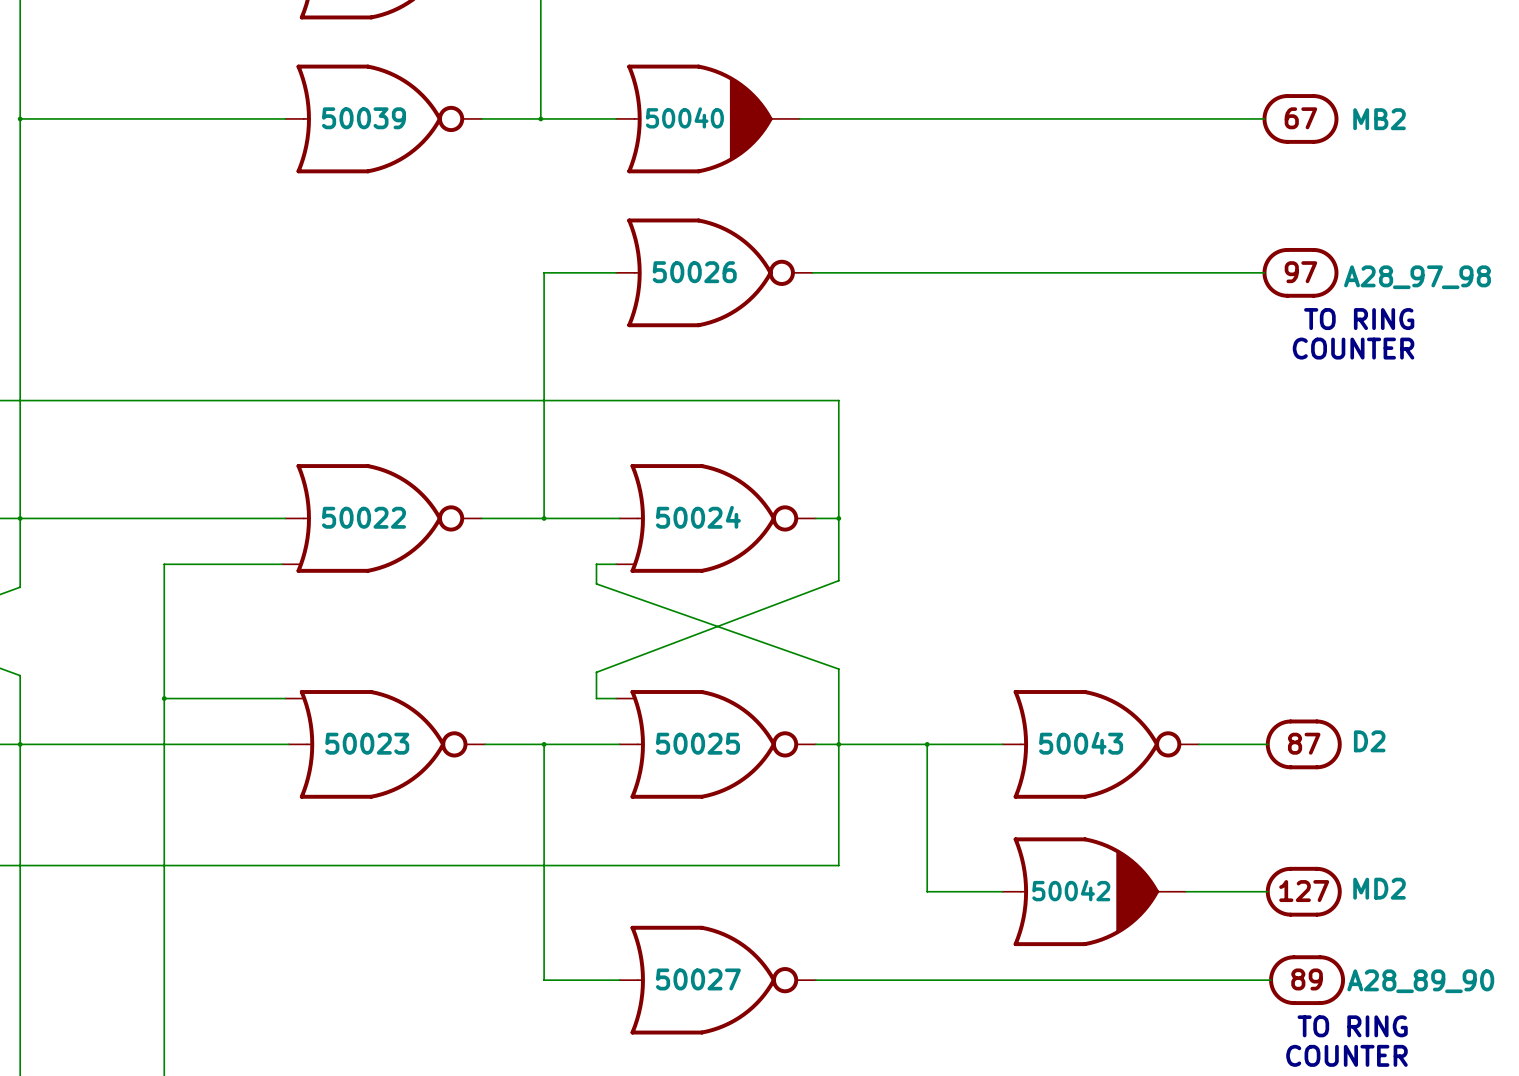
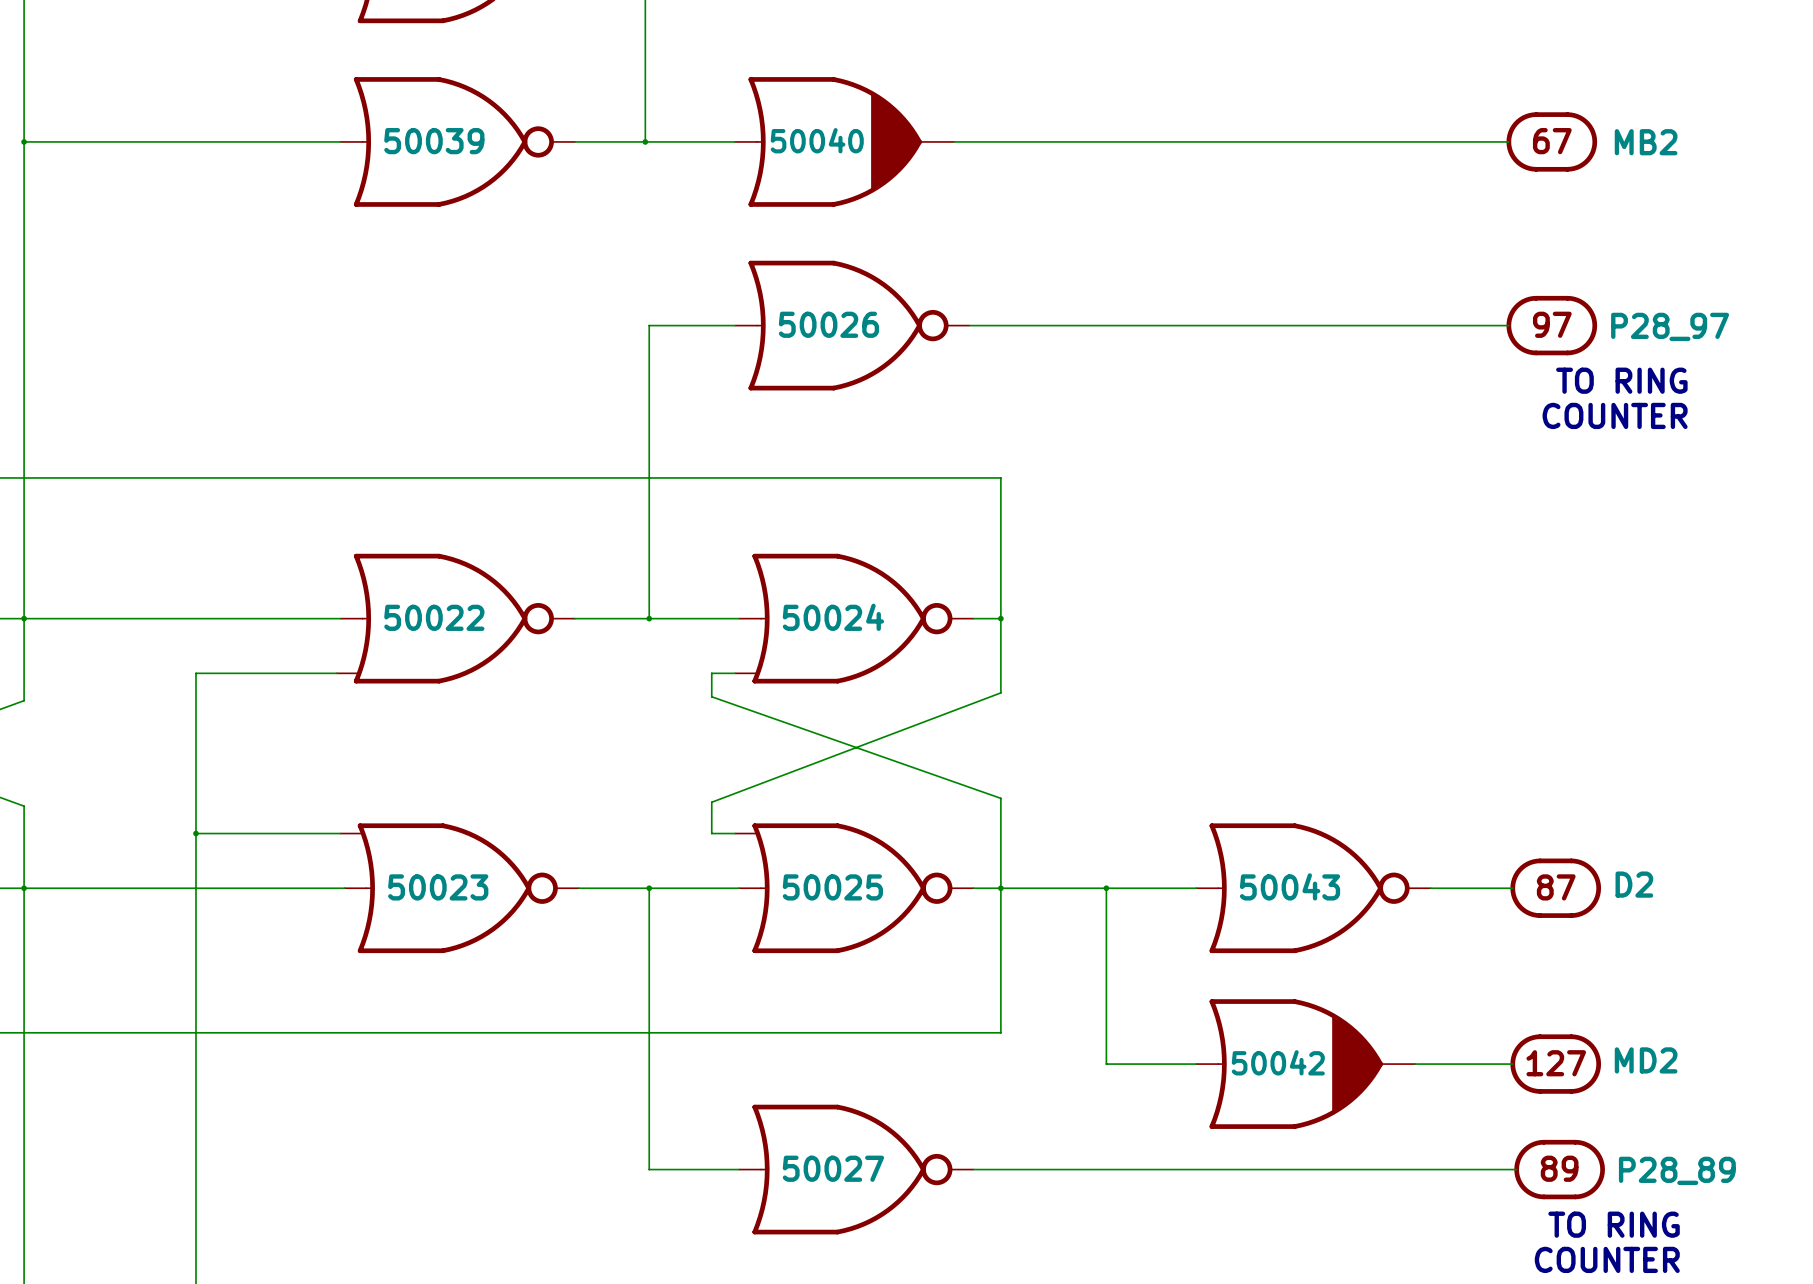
part text: A28_97_98 (1417, 277) -> P28_97 (1670, 326)
part text: A28_89_90 (1420, 981) -> P28_89 (1677, 1170)

